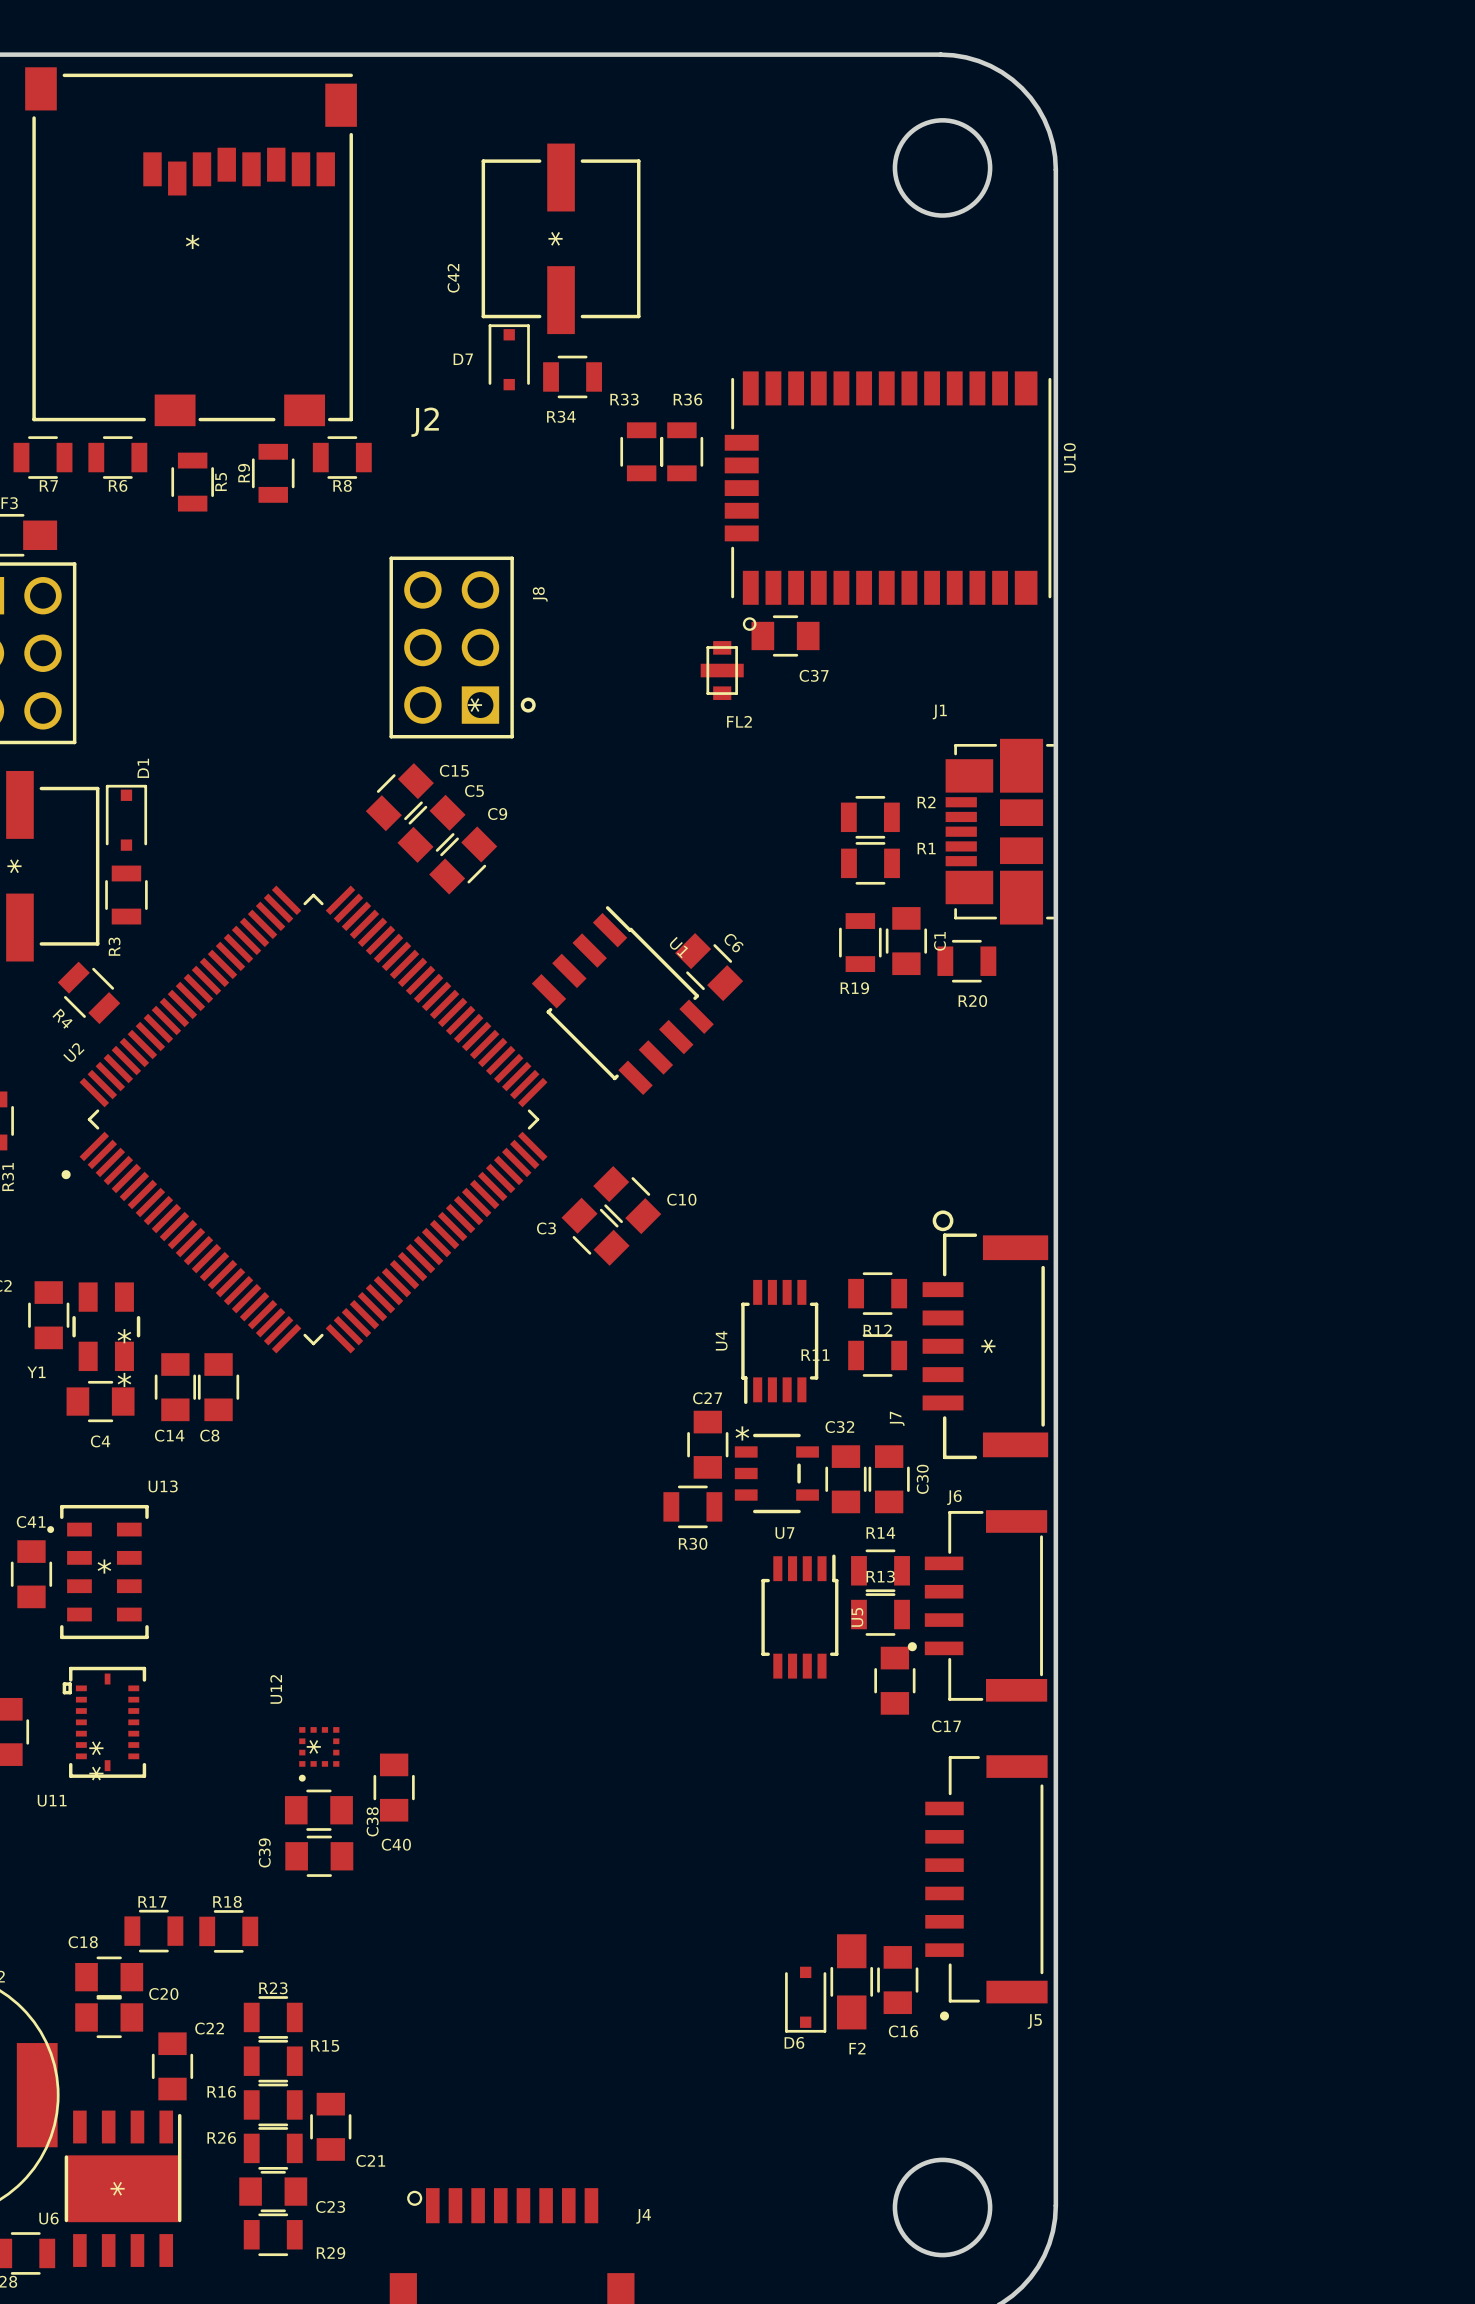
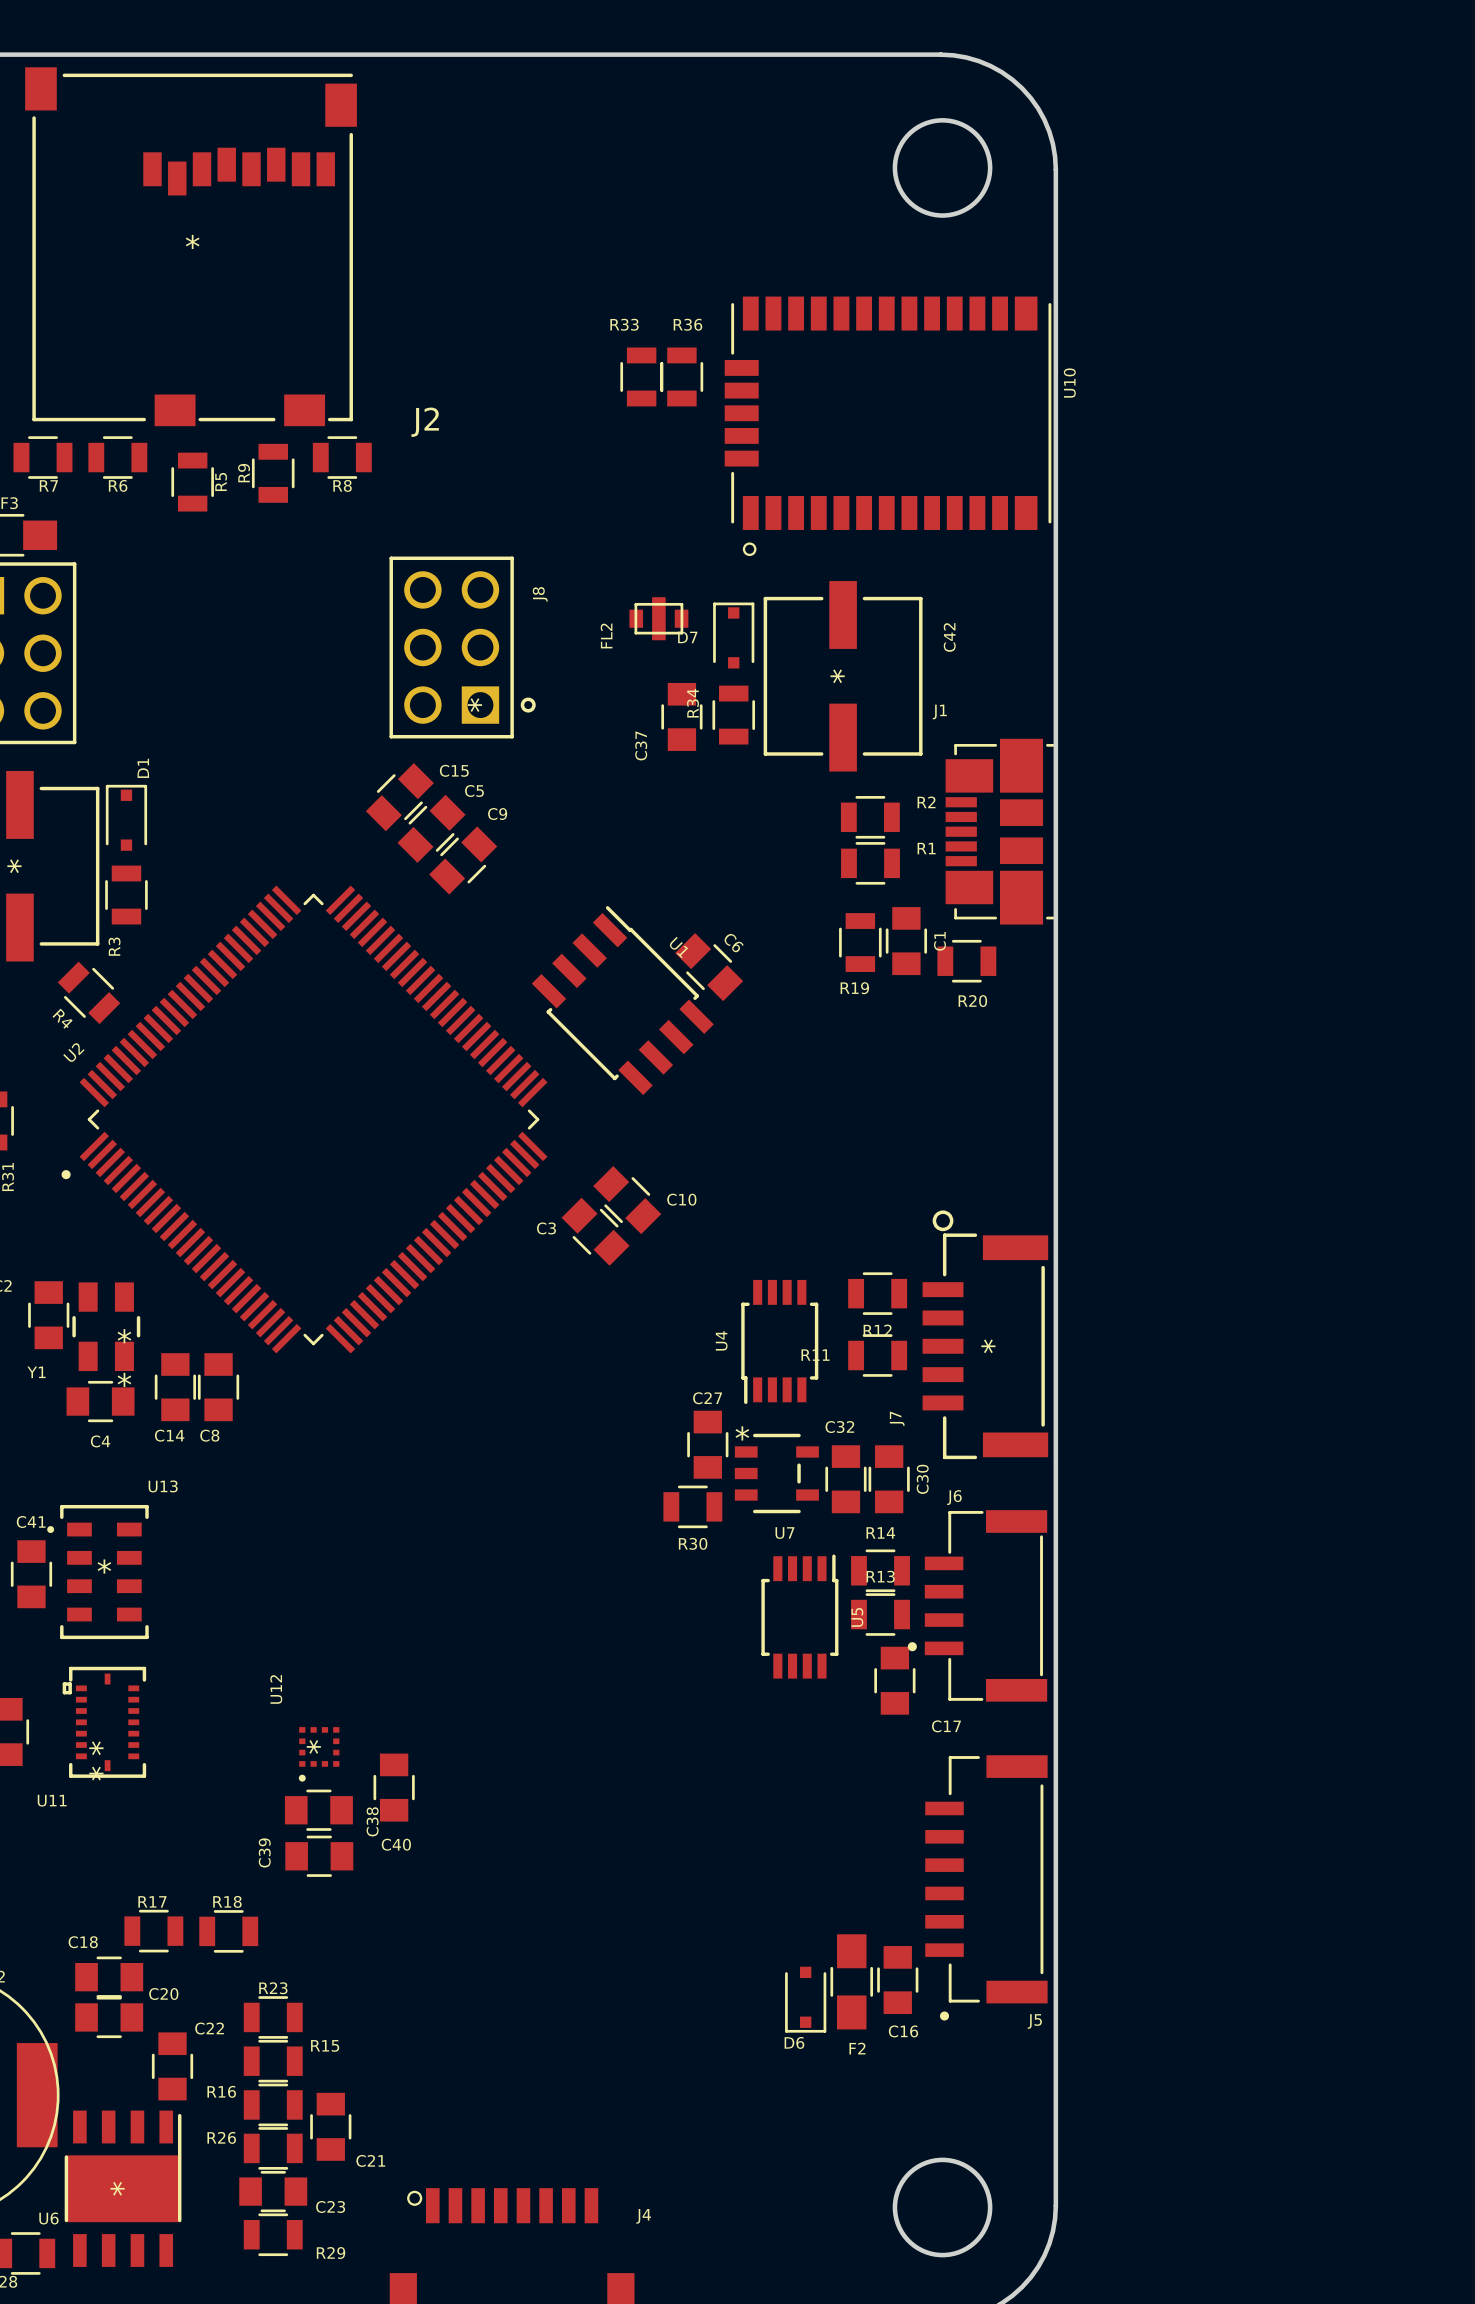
C42 position: (561, 238) -> (843, 676)
C42 name position: C42 (453, 278) -> C42 (949, 637)
D7 position: (509, 357) -> (733, 635)
R34 rotation: 0° (572, 376) -> 90° clockwise (733, 715)
R34 position: (572, 376) -> (733, 715)
R33 position: (641, 451) -> (641, 376)
R36 position: (681, 451) -> (681, 376)
U10 position: (888, 501) -> (888, 426)
C37 rotation: 0° (785, 635) -> 90° clockwise (681, 716)
C37 position: (785, 635) -> (681, 716)
FL2 rotation: 0° (722, 670) -> 90° clockwise (658, 618)
FL2 position: (722, 670) -> (658, 618)

